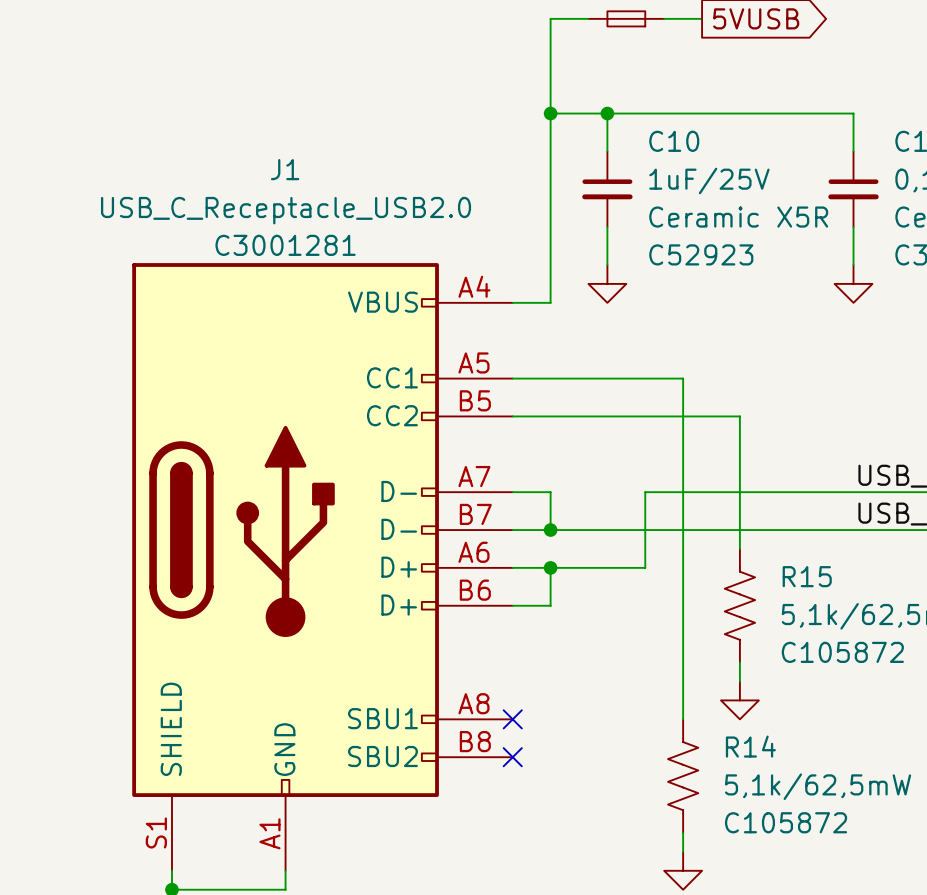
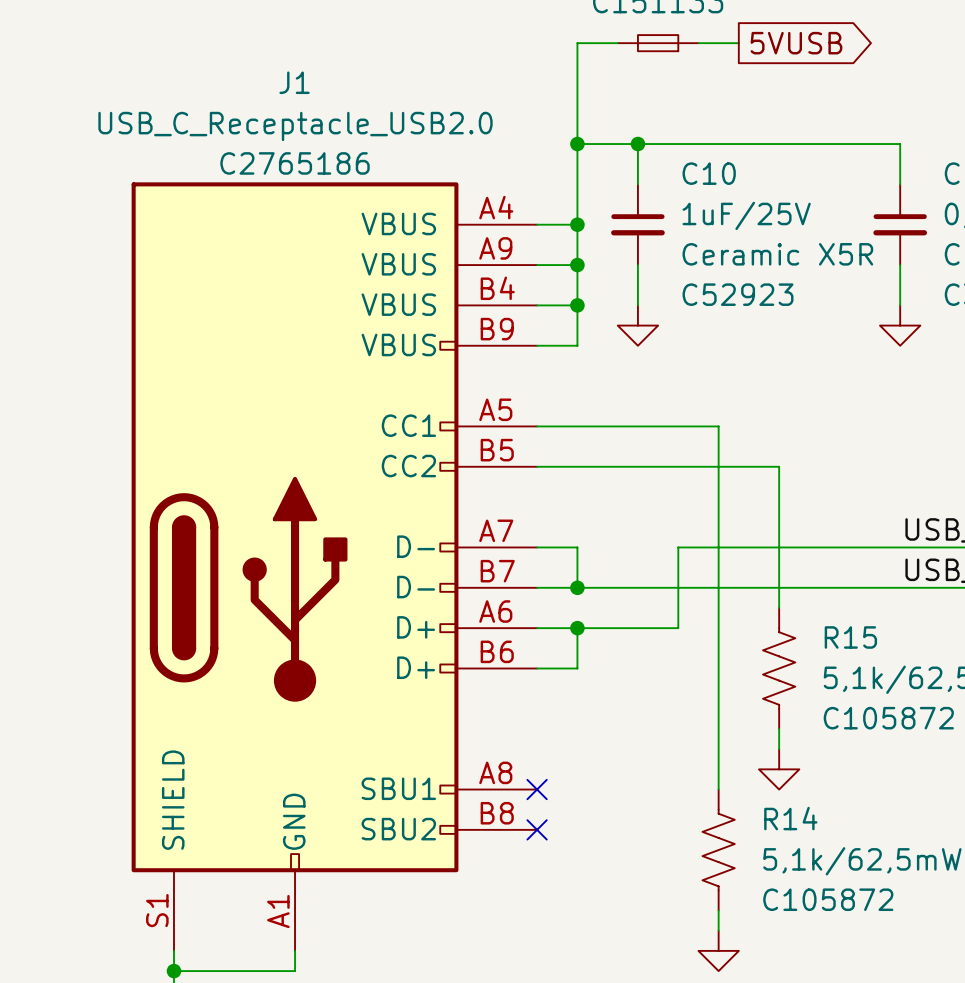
J1 name position: J1 (285, 169) -> J1 (294, 82)
wire: none -> (537, 224) (577, 224)
junction: none -> (577, 224)
J1 value position: USB_C_Receptacle_USB2.0 (286, 210) -> USB_C_Receptacle_USB2.0 (295, 126)
wire: none -> (537, 265) (577, 265)
junction: none -> (577, 265)
J1 text: C3001281 (285, 245) -> C2765186 (295, 163)
J1 symbol: [132, 263, 513, 871] -> [131, 182, 538, 951]
wire: none -> (537, 305) (577, 305)
junction: none -> (577, 305)

